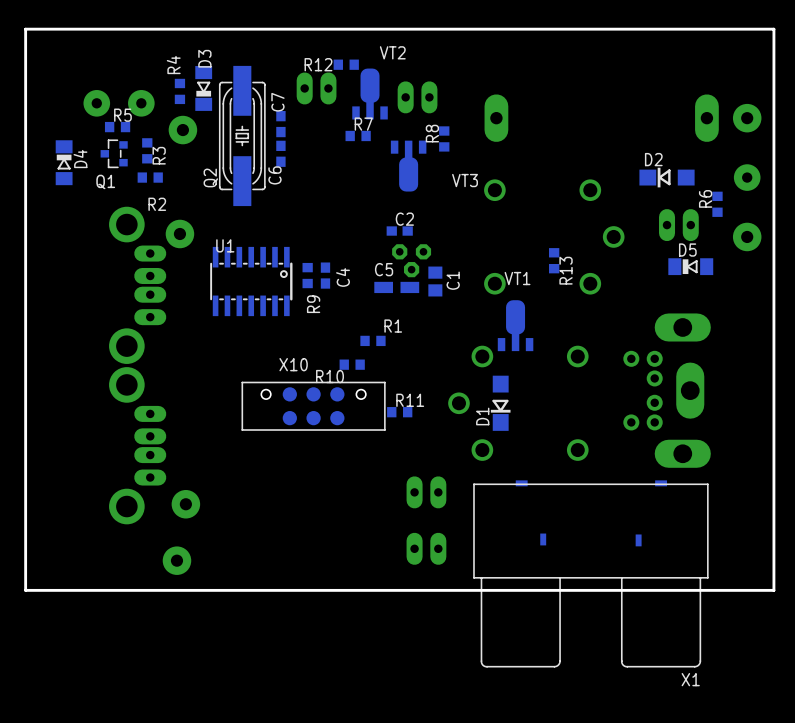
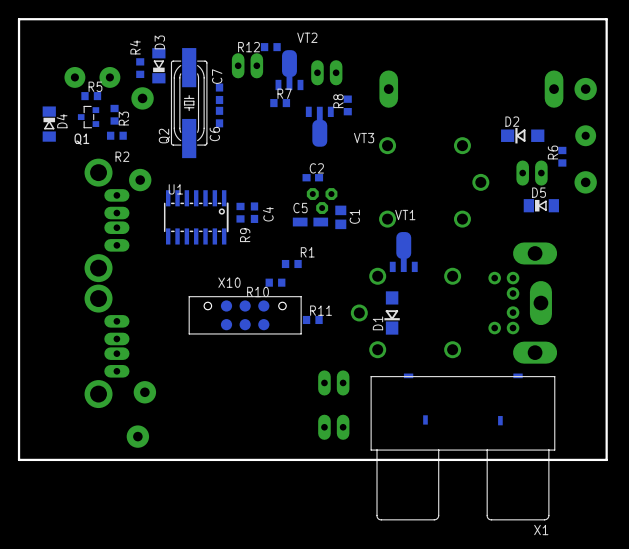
R13: (554, 260) -> none

